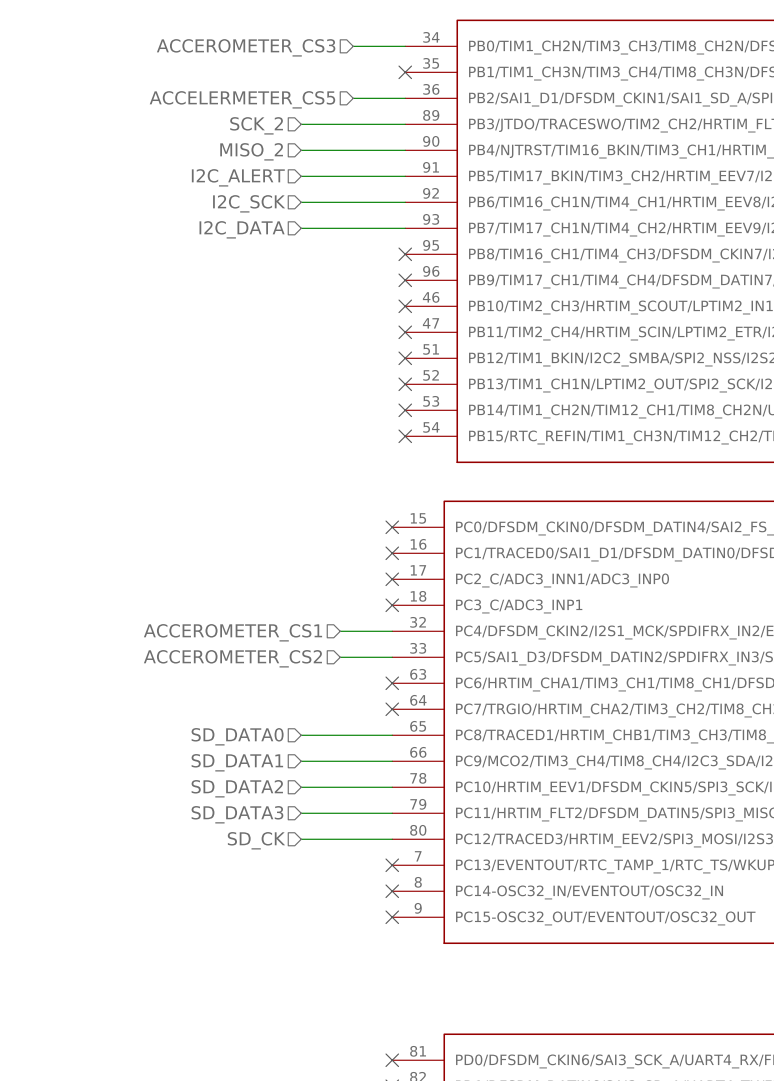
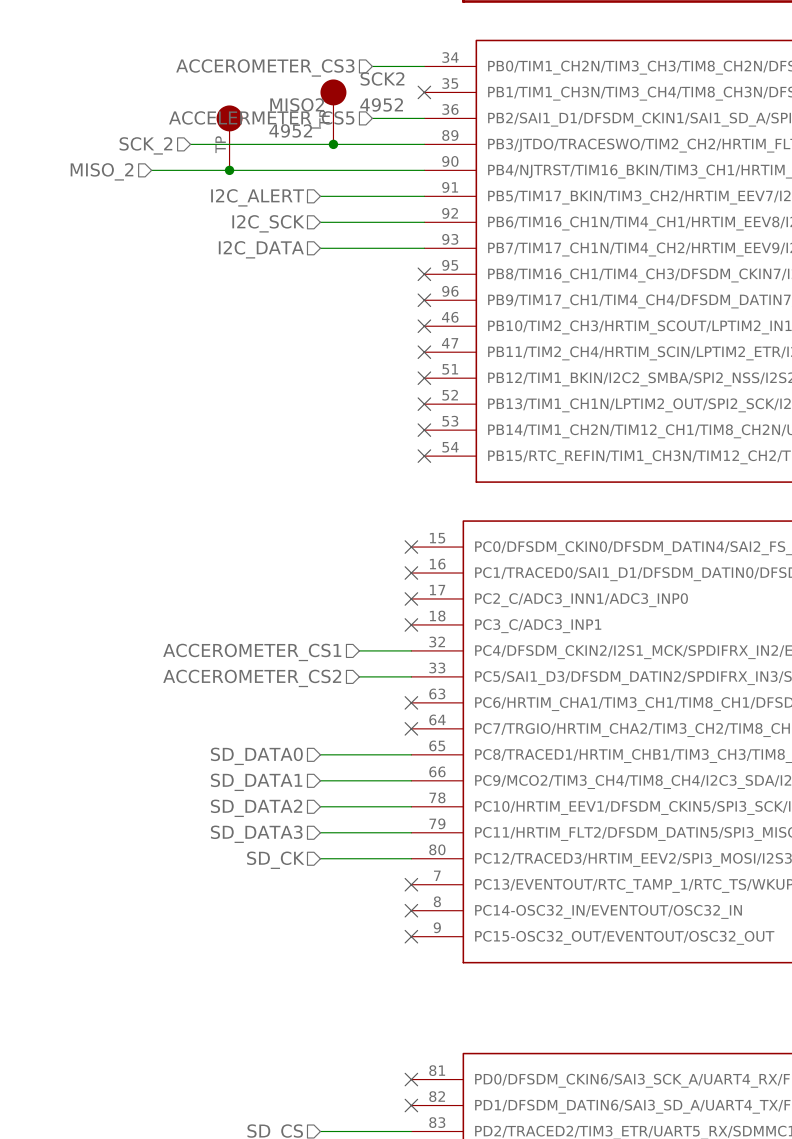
SCK2: none -> 4952 (333, 111)
MISO2: none -> 4952 (229, 137)
wire: none -> (190, 144) (320, 144)
junction: none -> (333, 144)
hierarchical label position: SCK_2 (256, 125) -> SCK_2 (145, 145)
wire: none -> (151, 170) (320, 170)
junction: none -> (229, 170)
hierarchical label position: MISO_2 (251, 151) -> MISO_2 (102, 171)

